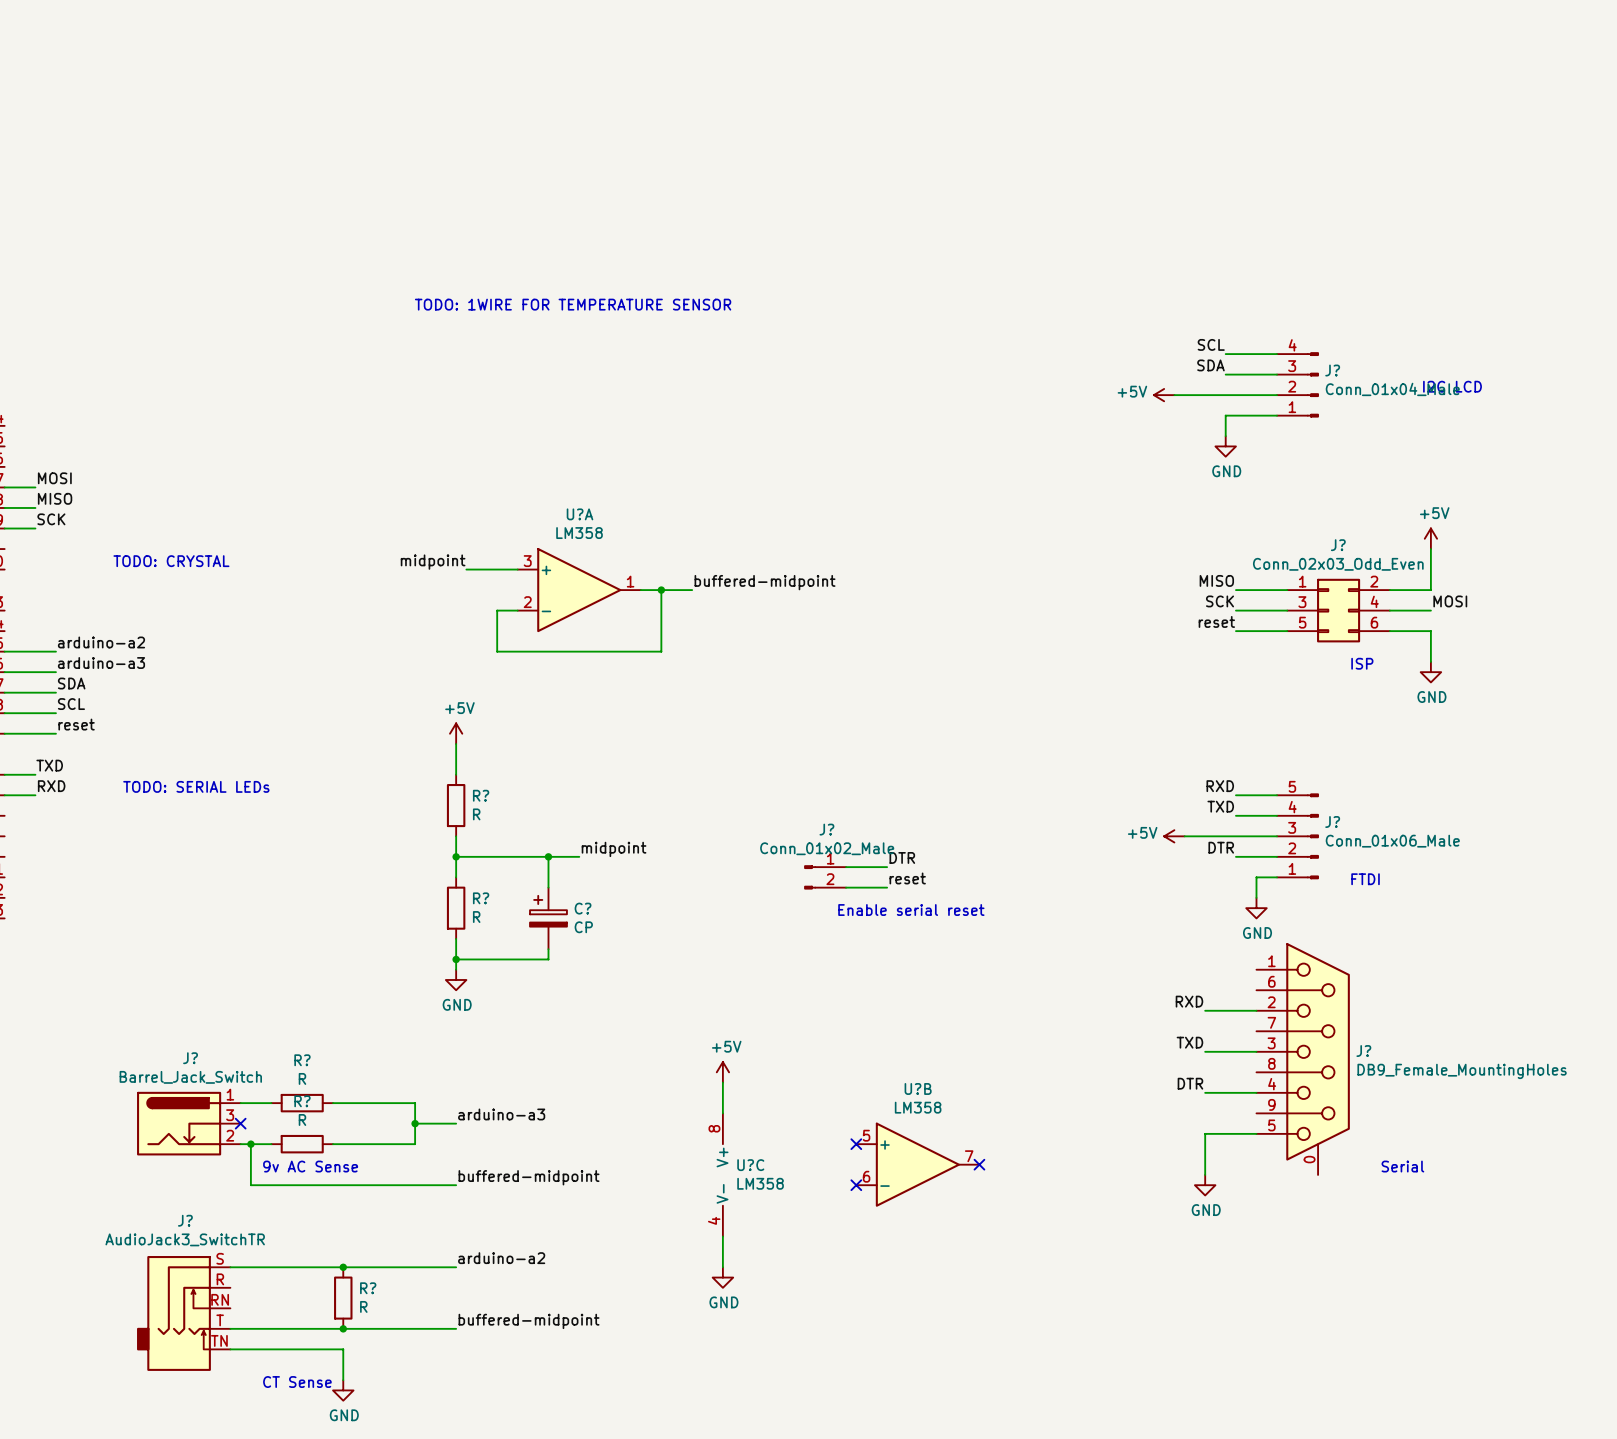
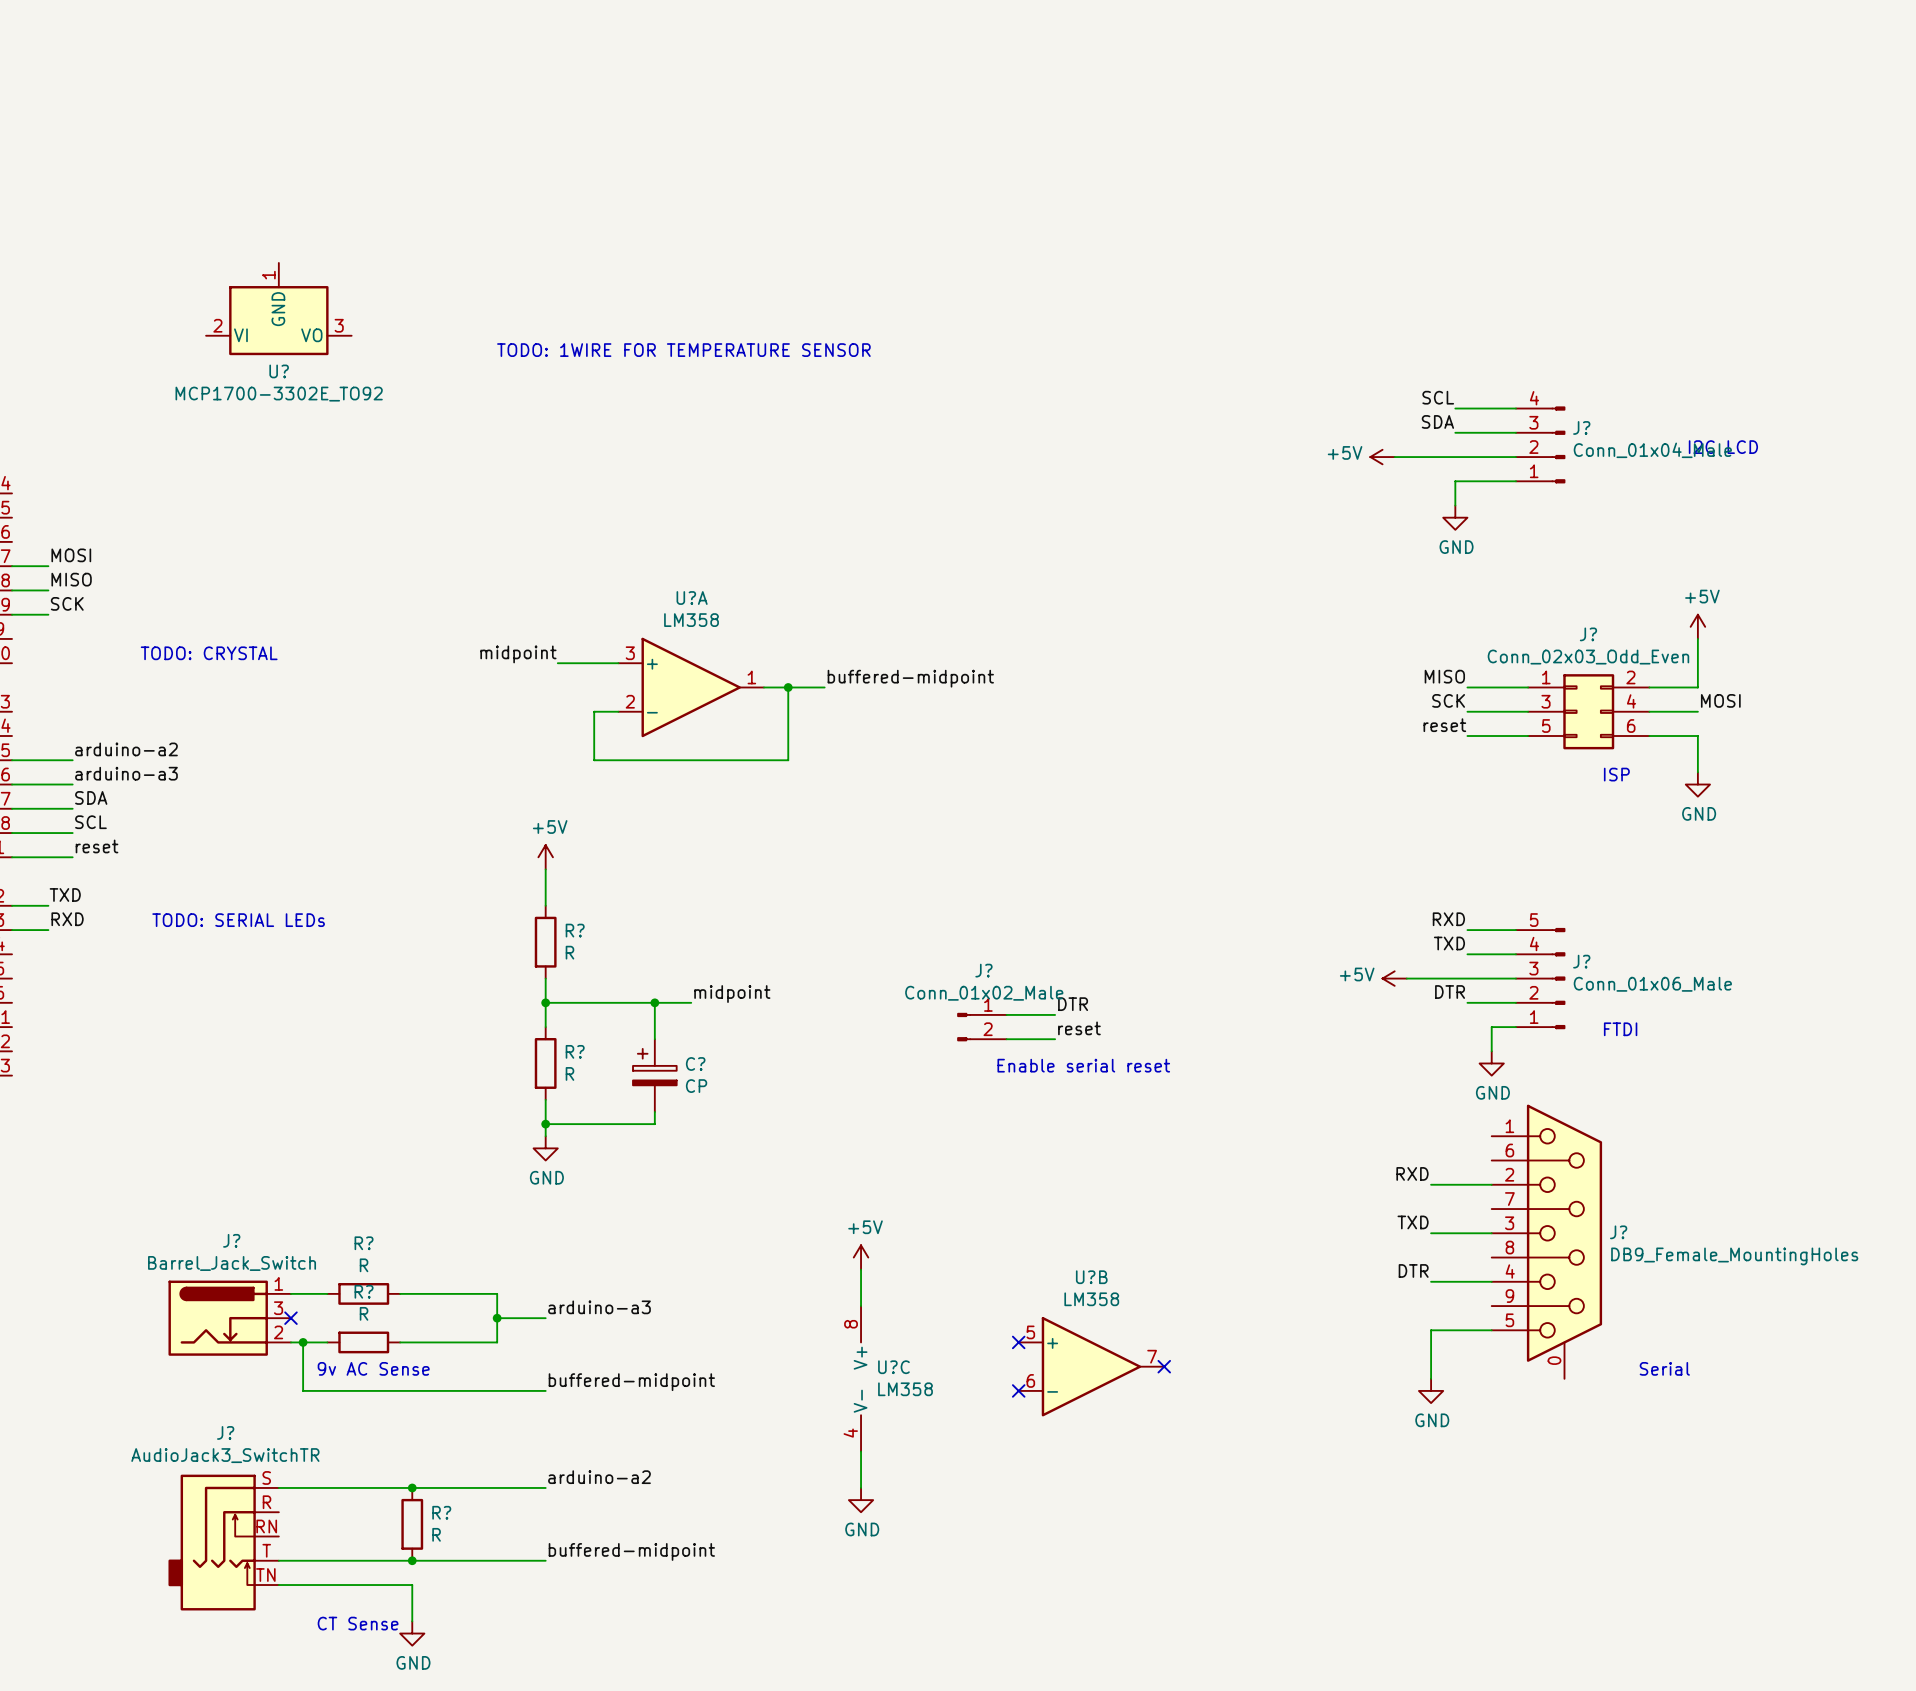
U?: none -> MCP1700-3302E_TO92 (278, 309)

